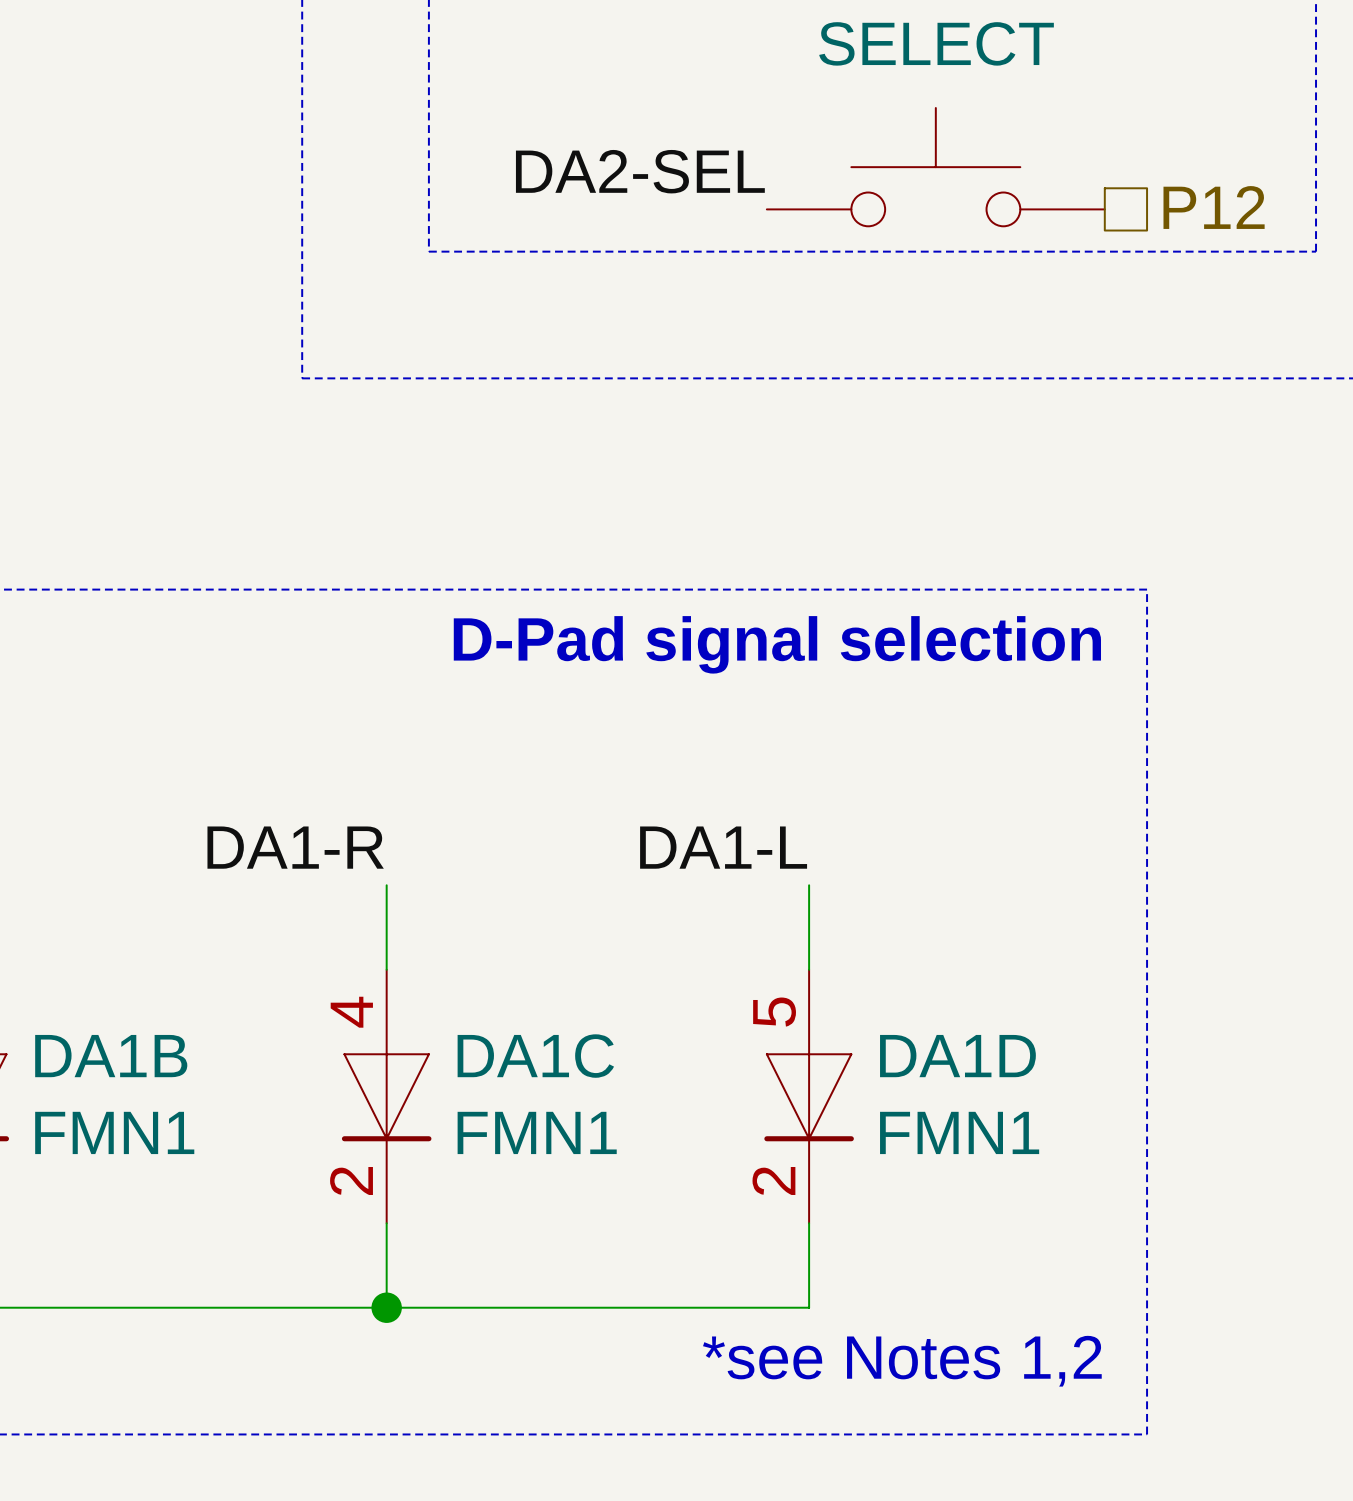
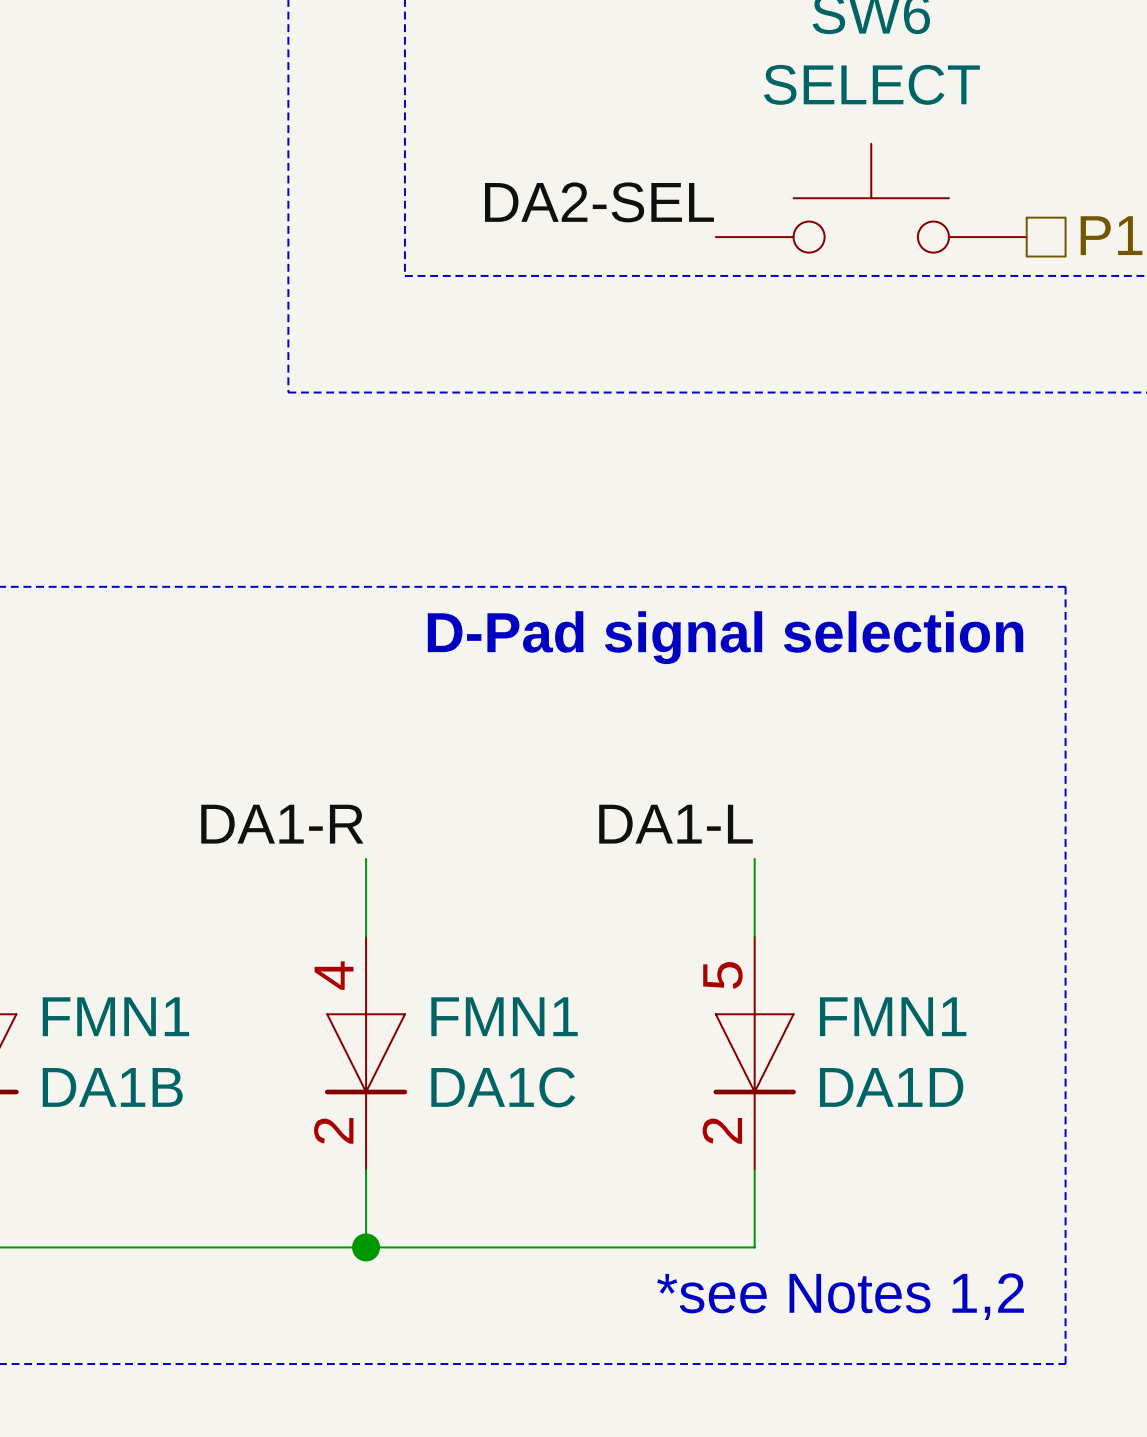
DA1B name position: DA1B (111, 1056) -> DA1B (112, 1087)
DA1C name position: DA1C (535, 1056) -> DA1C (503, 1087)
DA1D name position: DA1D (957, 1056) -> DA1D (891, 1087)
DA1B value position: FMN1 (114, 1132) -> FMN1 (115, 1016)
DA1C value position: FMN1 (537, 1132) -> FMN1 (504, 1016)
DA1D value position: FMN1 (959, 1132) -> FMN1 (893, 1016)

